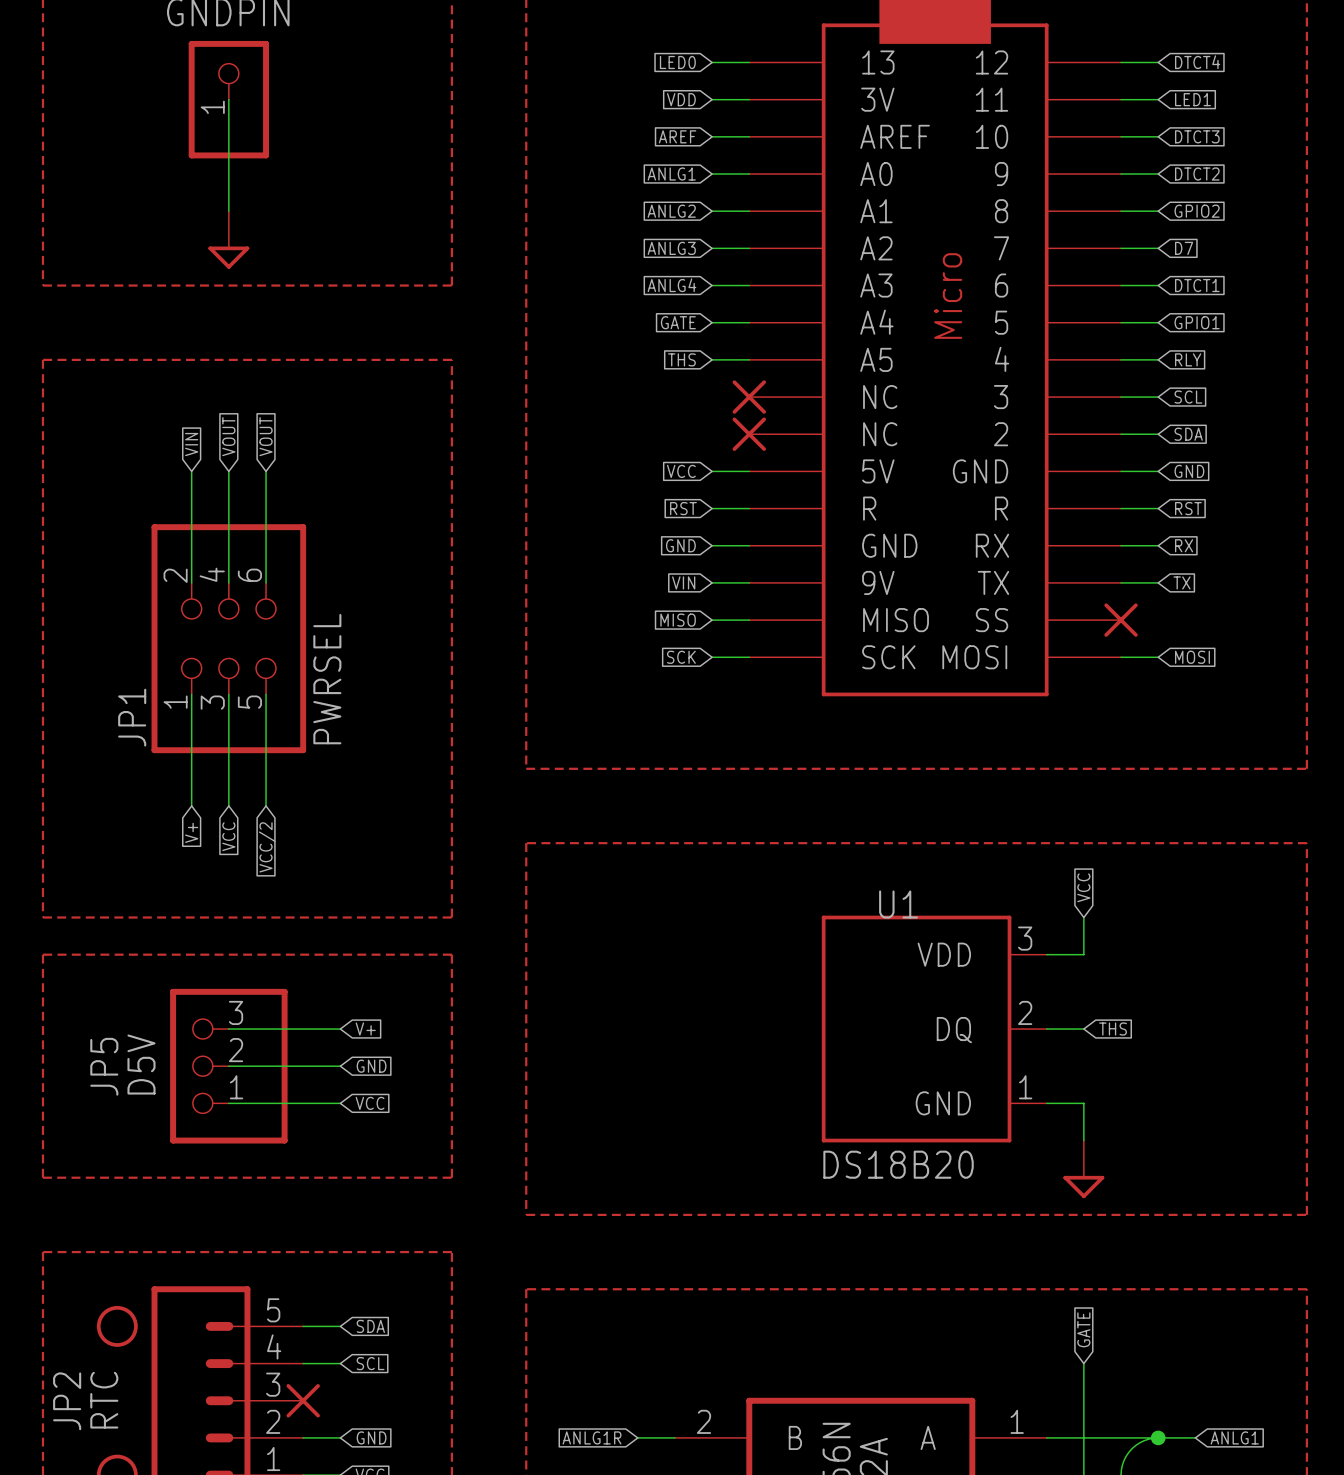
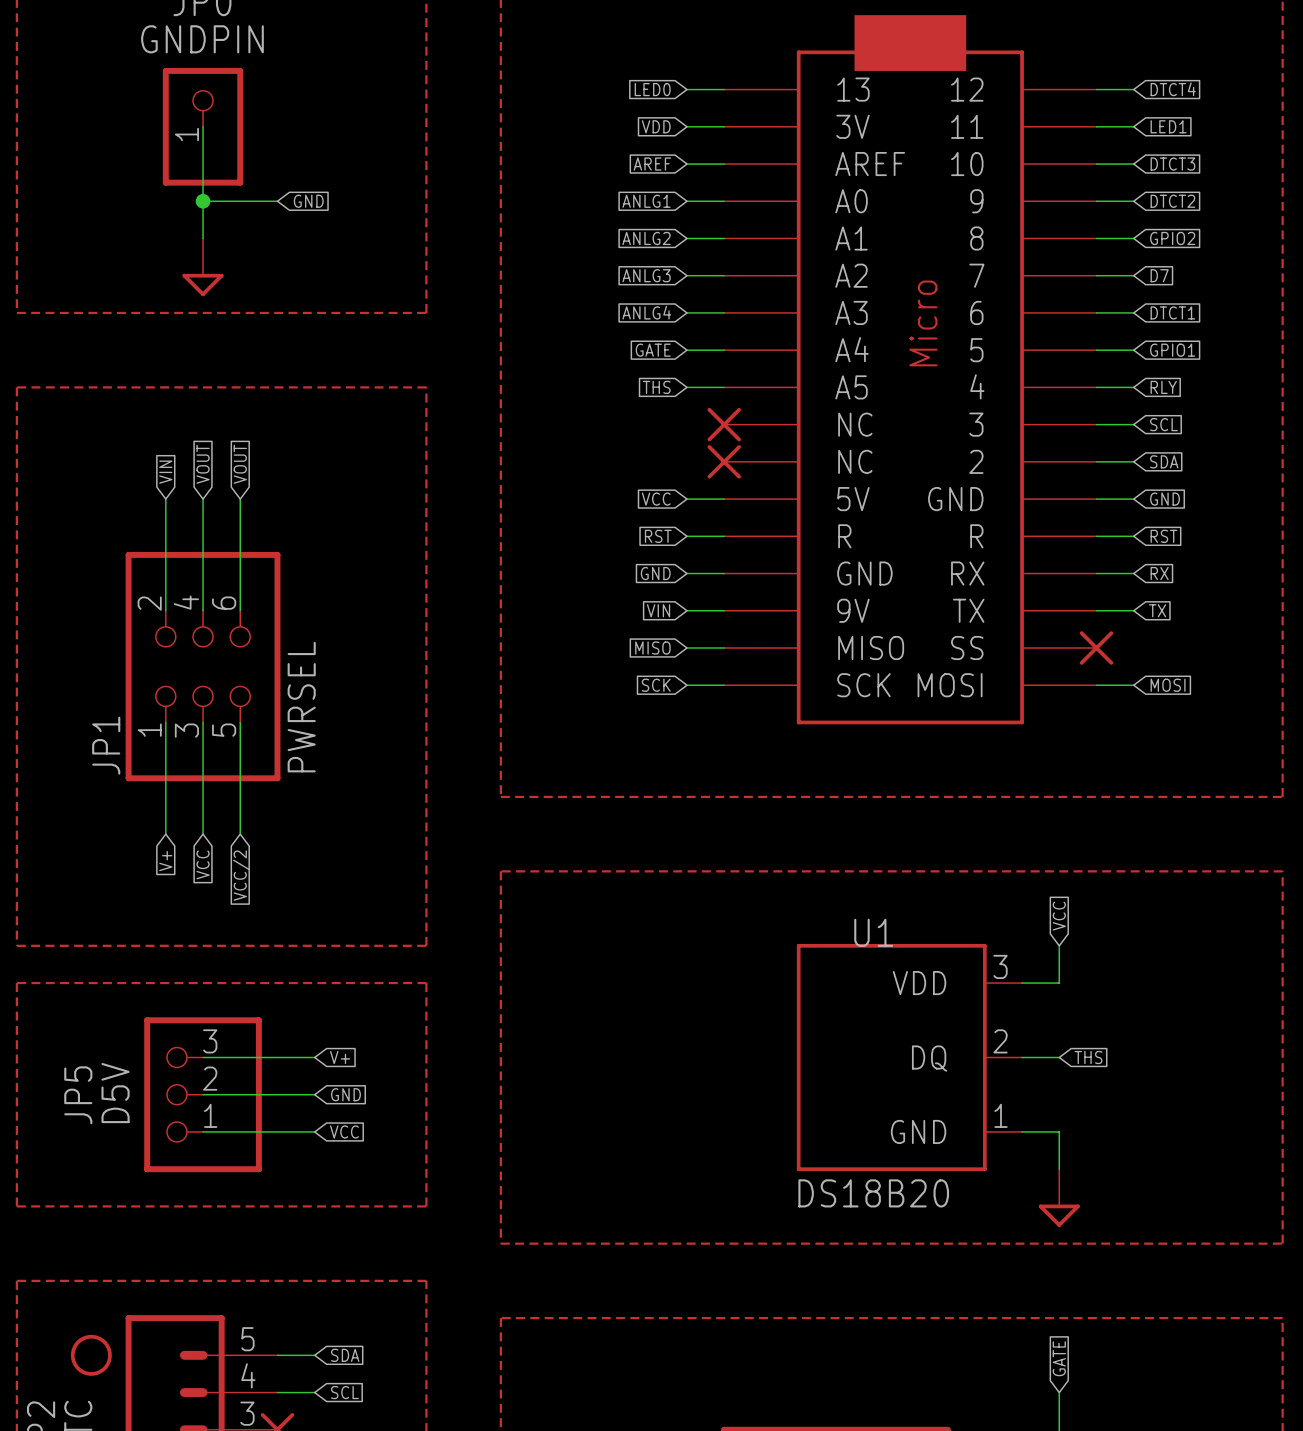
wire: none -> (203, 201) (277, 201)
junction: none -> (203, 201)
global label: none -> GND (308, 201)

